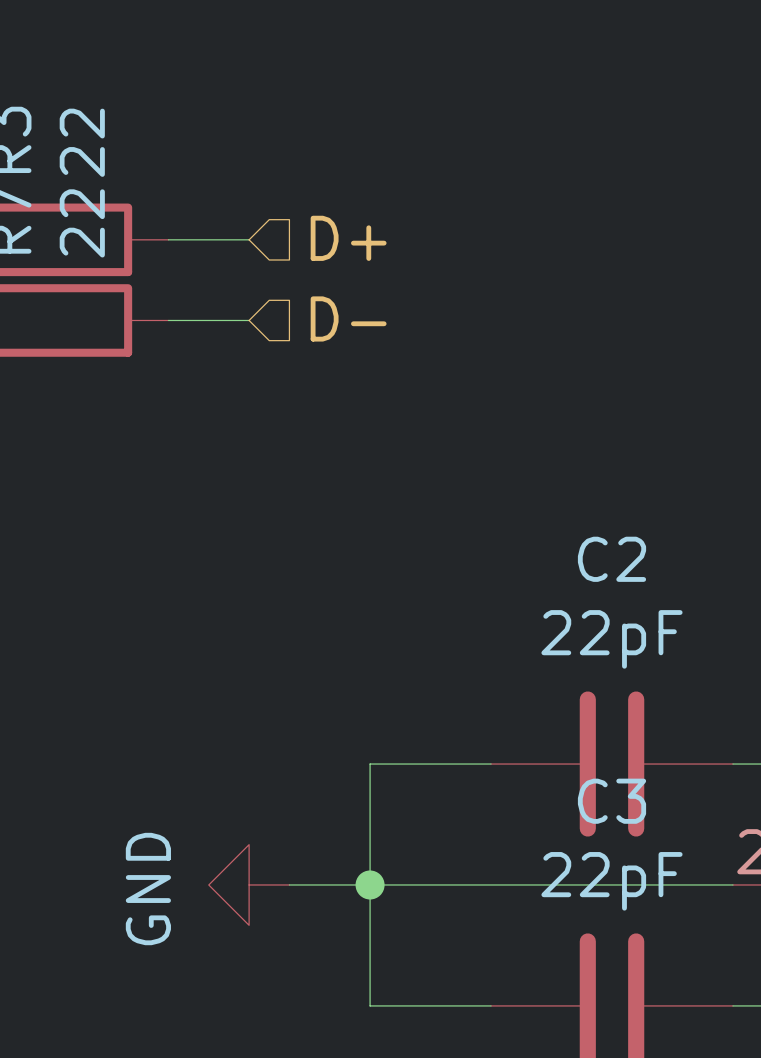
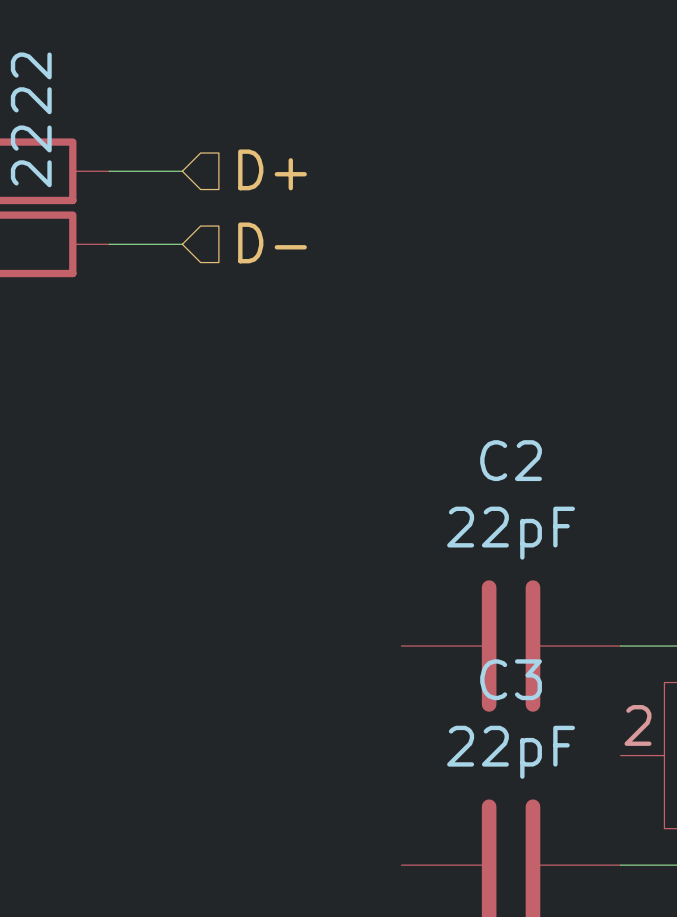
wire: (491, 764) (370, 764) (370, 1005) (491, 1005) -> none
power symbol: GND (249, 884) -> none
wire: (289, 884) (732, 884) -> none
junction: (370, 884) -> none

